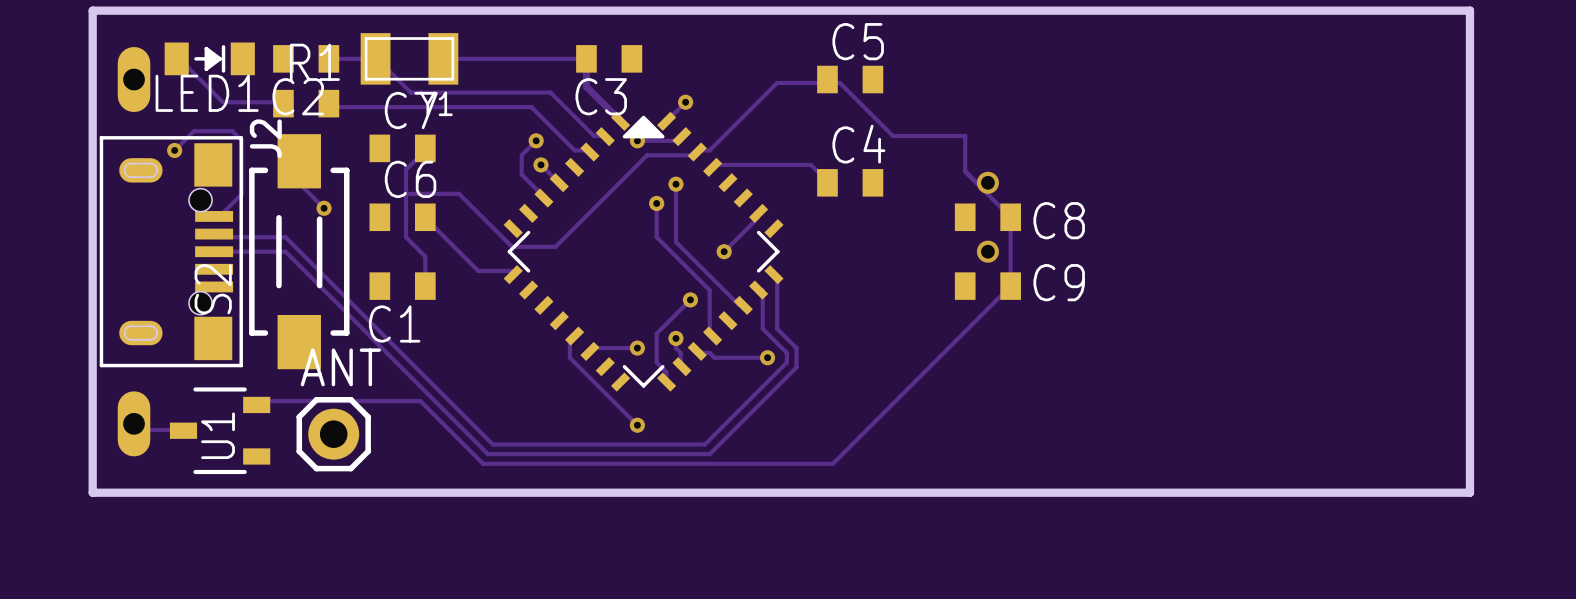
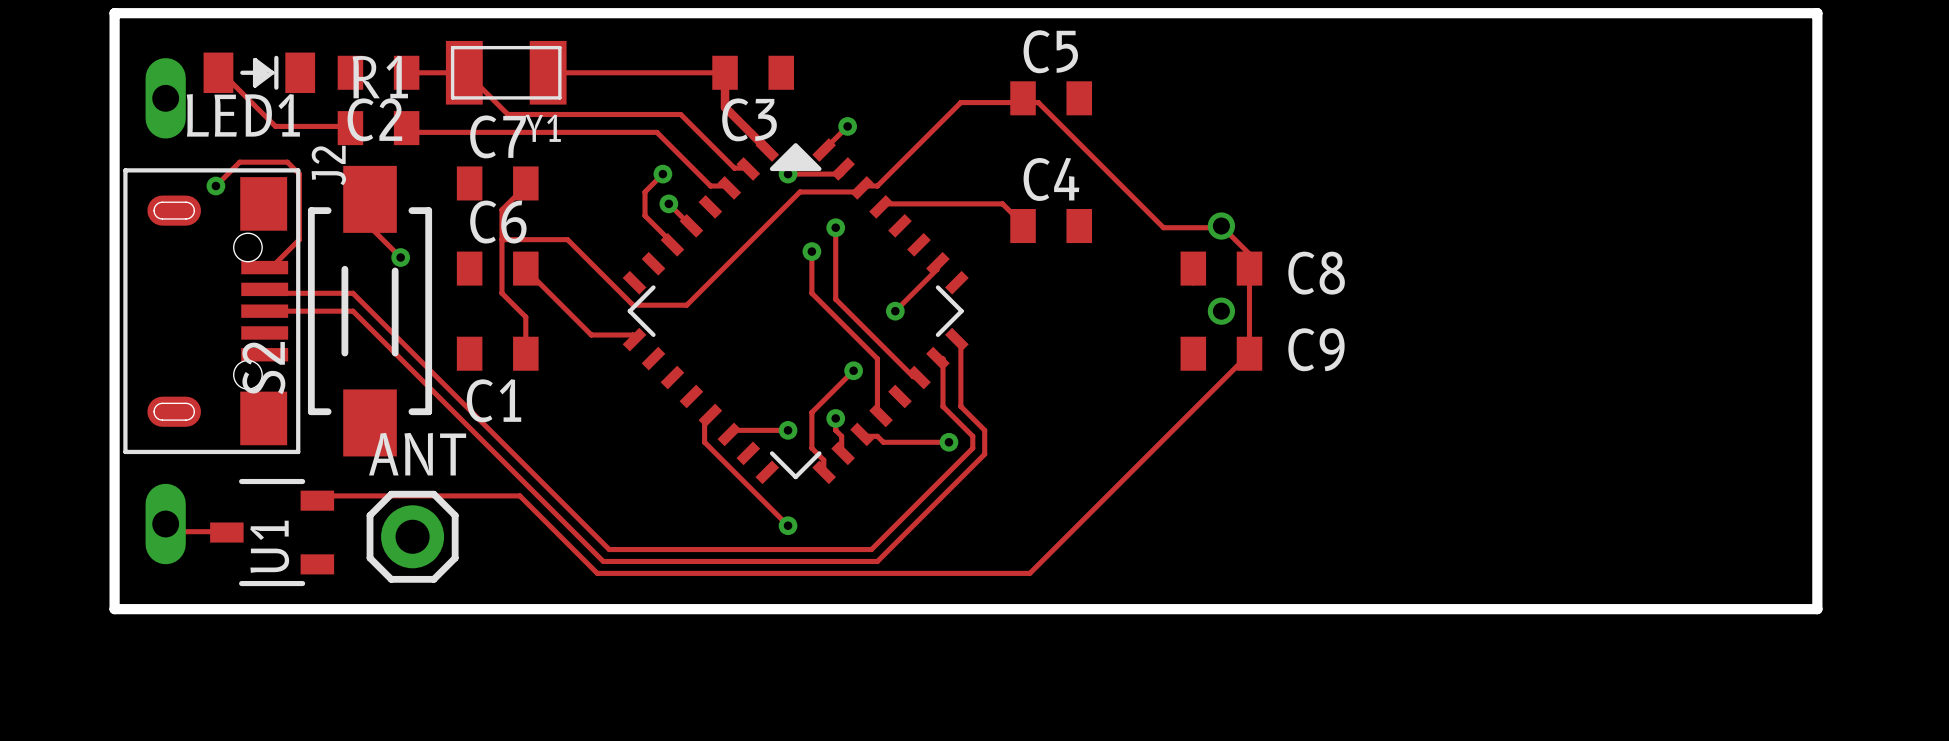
track: (892, 135) (965, 135) (965, 171) (1010, 217) -> (1103, 168) (1163, 227) (1219, 227) (1221, 226) (1249, 254) (1249, 268)

